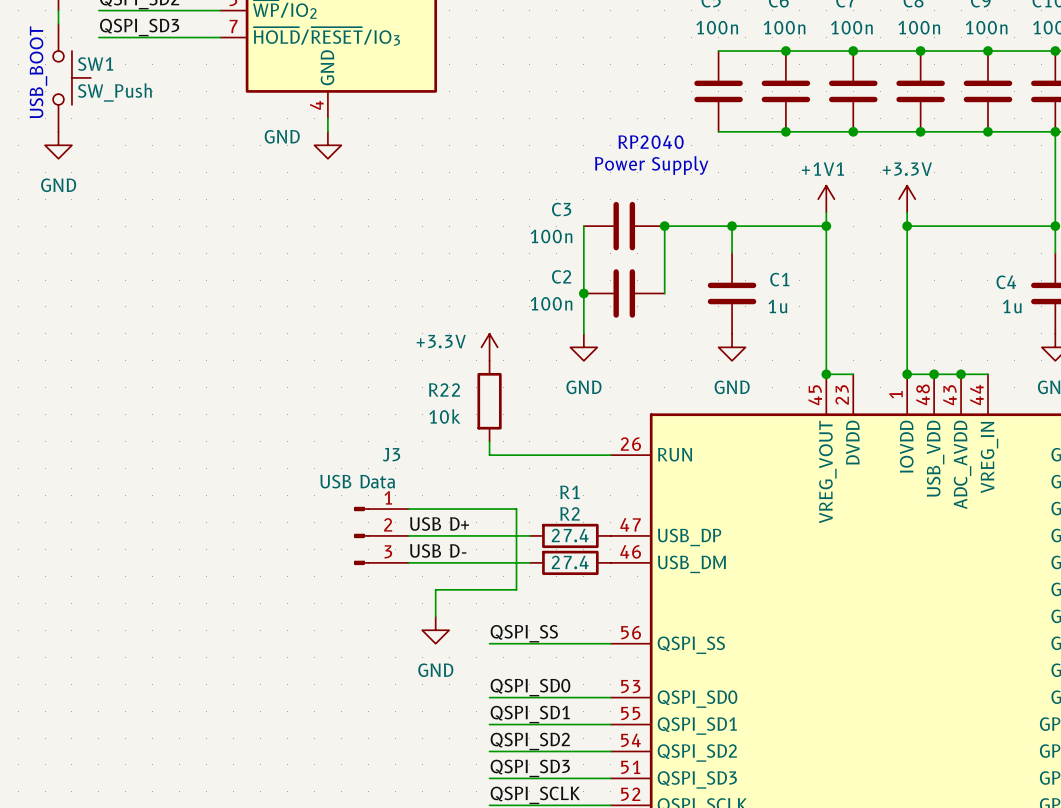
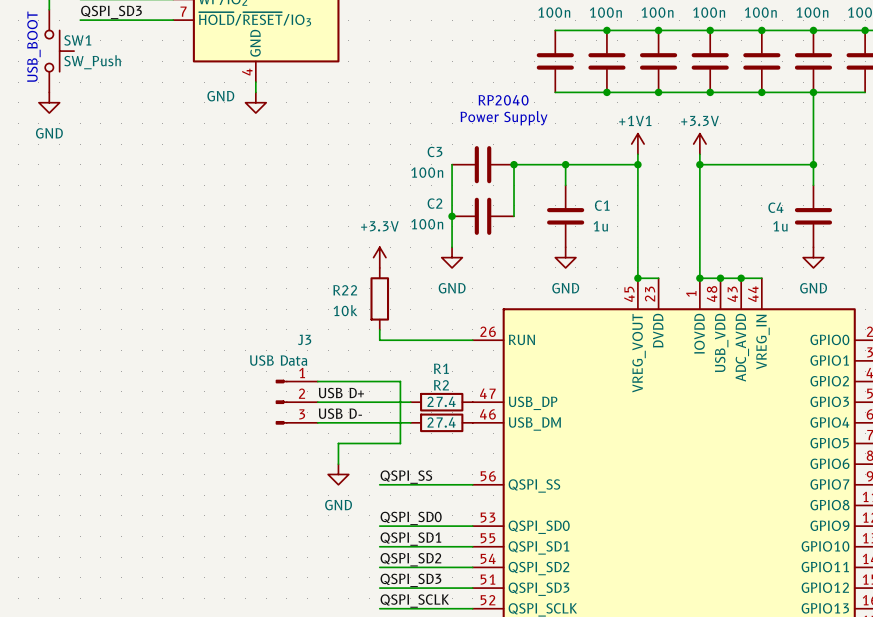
power symbol text position: +3.3V (441, 341) -> +3.3V (379, 226)

